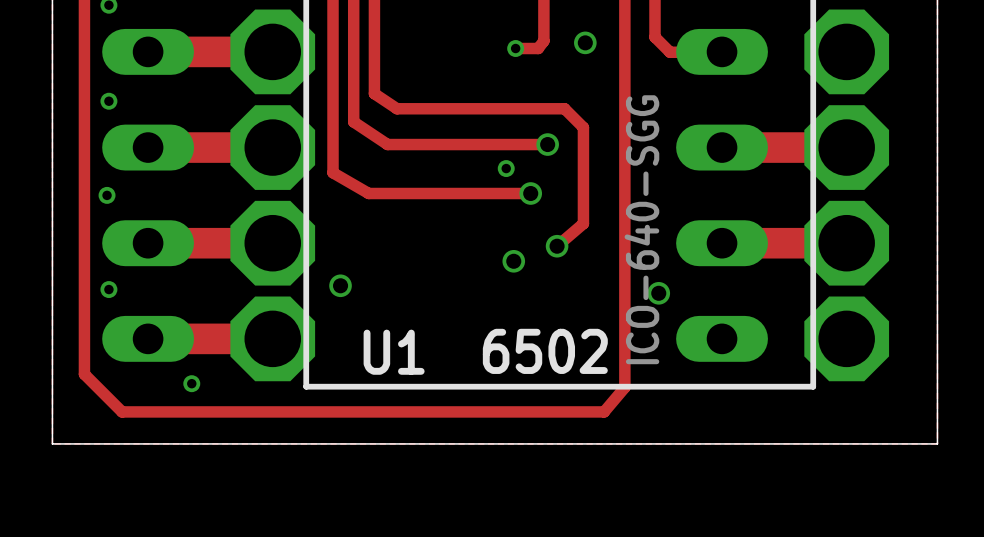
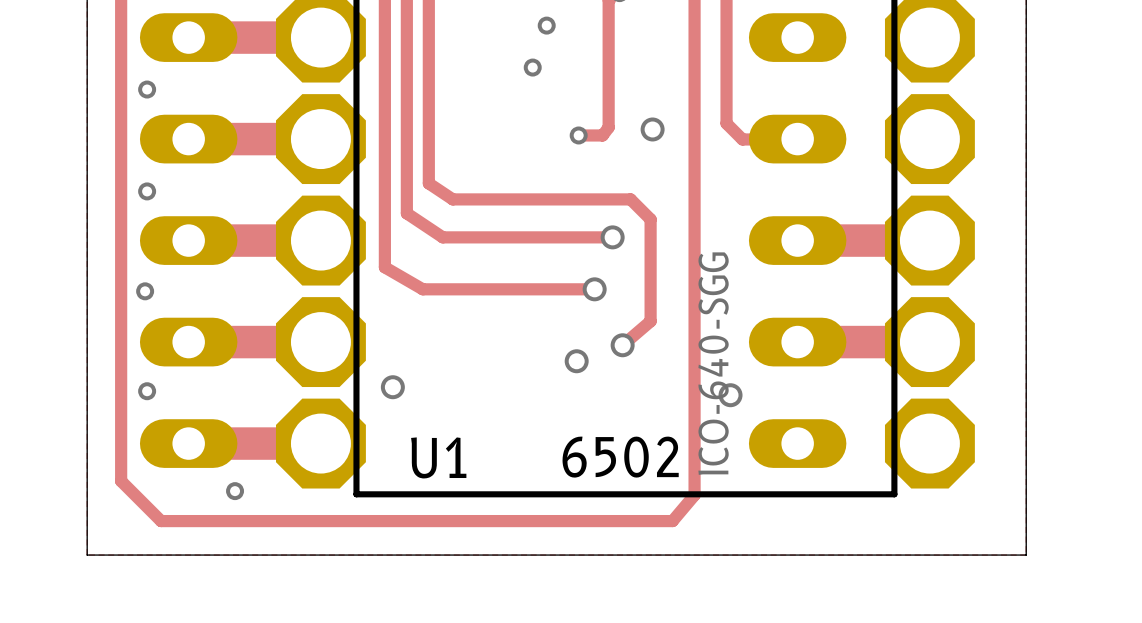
via: (506, 168) -> none

